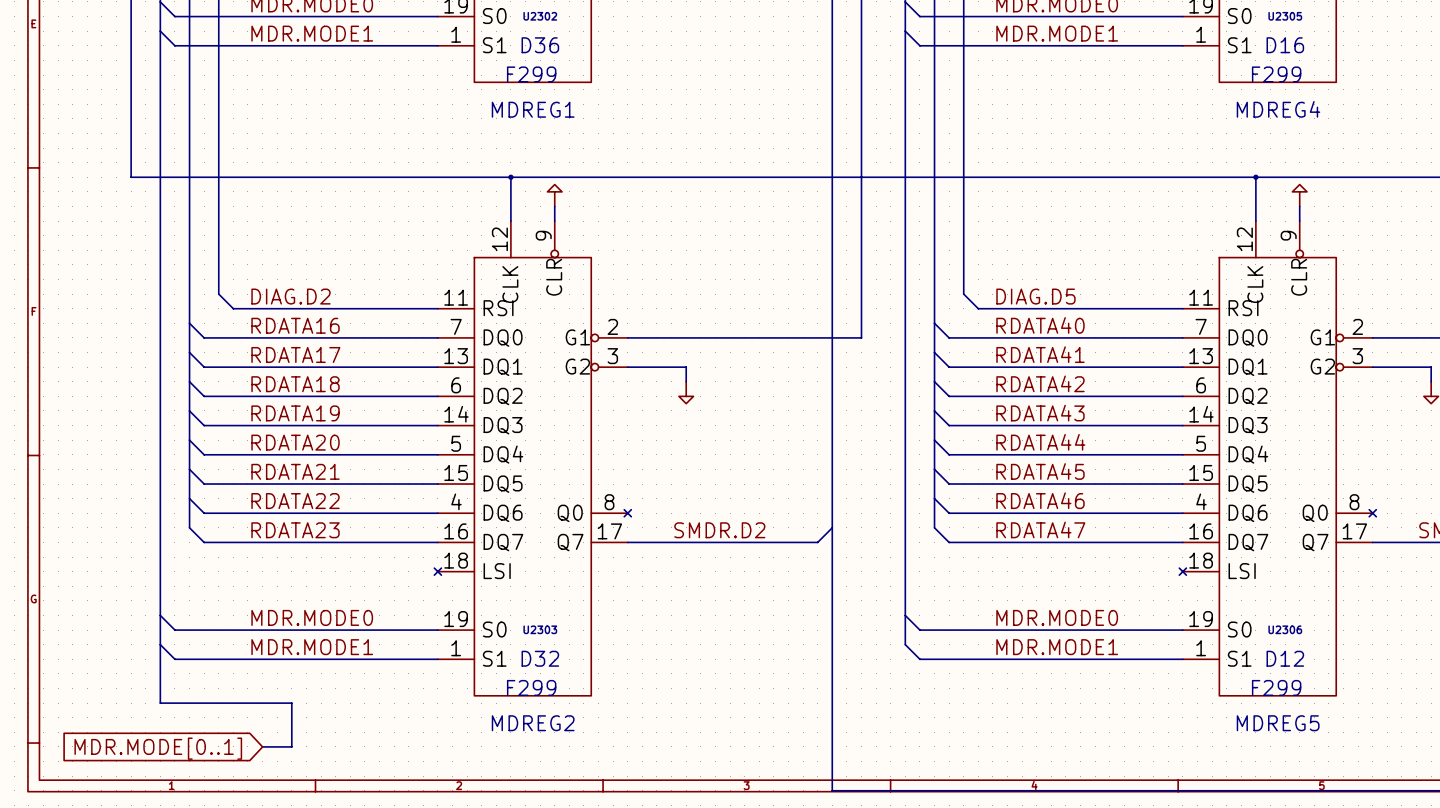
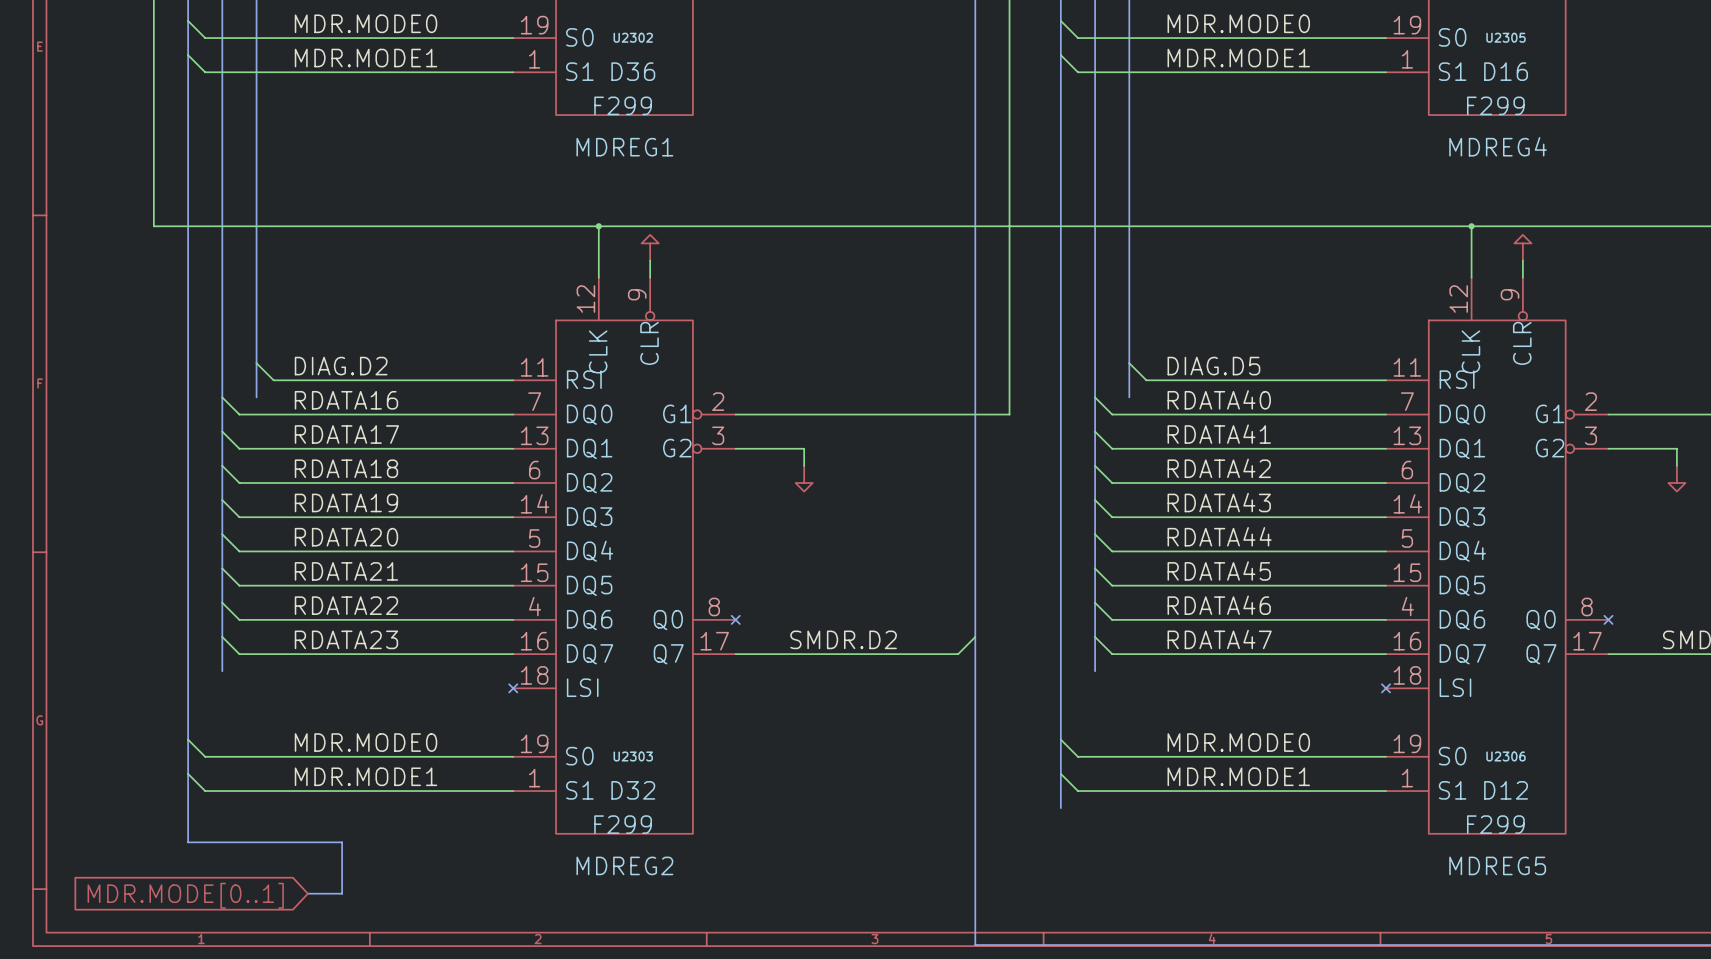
bus: none -> (256, 363) (256, 397)
bus: none -> (1129, 363) (1129, 397)
bus: none -> (222, 637) (222, 671)
bus: none -> (1095, 637) (1095, 671)
bus: none -> (1060, 773) (1060, 808)

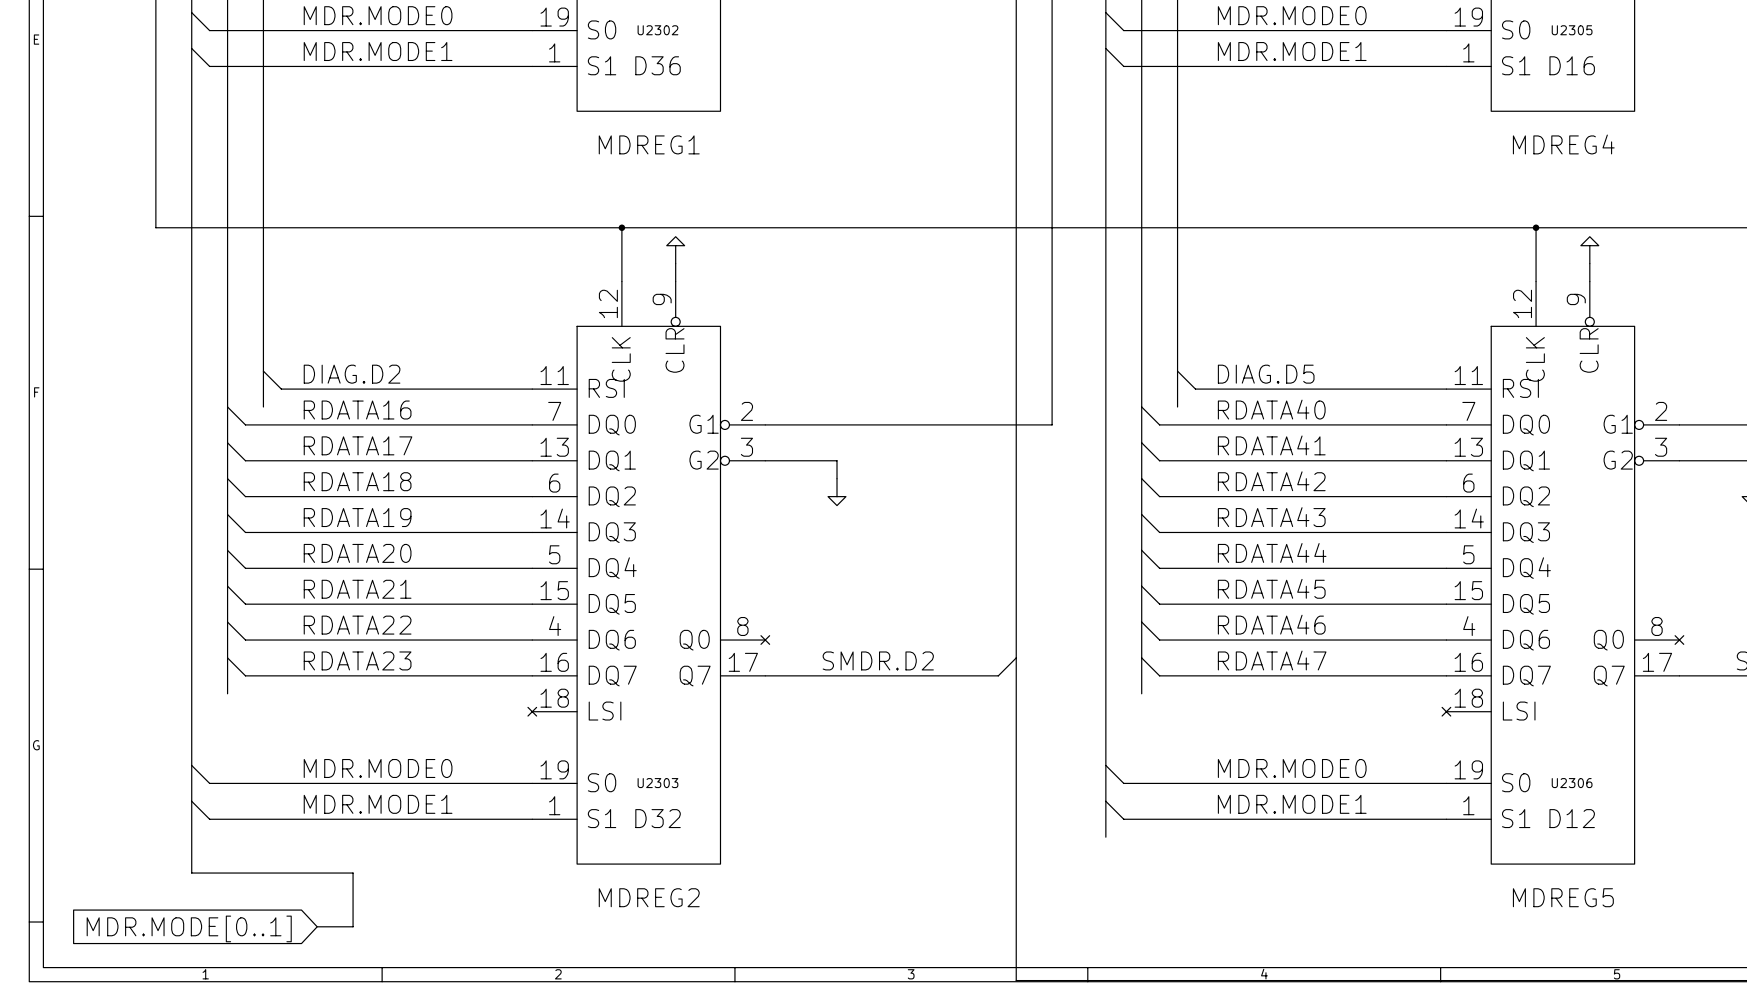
U2302 value: F299 (623, 105) -> none
U2305 value: F299 (1495, 105) -> none
U2303 value: F299 (623, 824) -> none
U2306 value: F299 (1495, 824) -> none

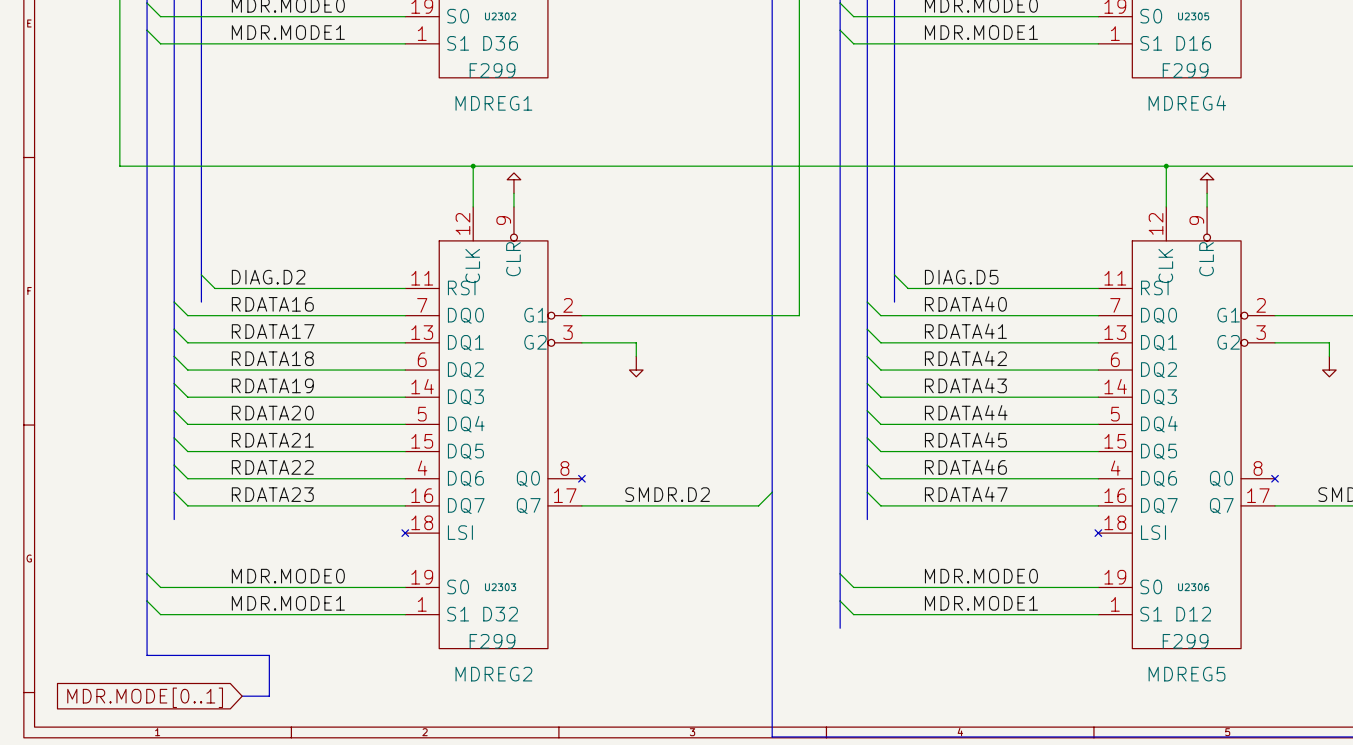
U2302 value: none -> F299 (492, 70)
U2305 value: none -> F299 (1185, 70)
U2303 value: none -> F299 (492, 641)
U2306 value: none -> F299 (1185, 641)

